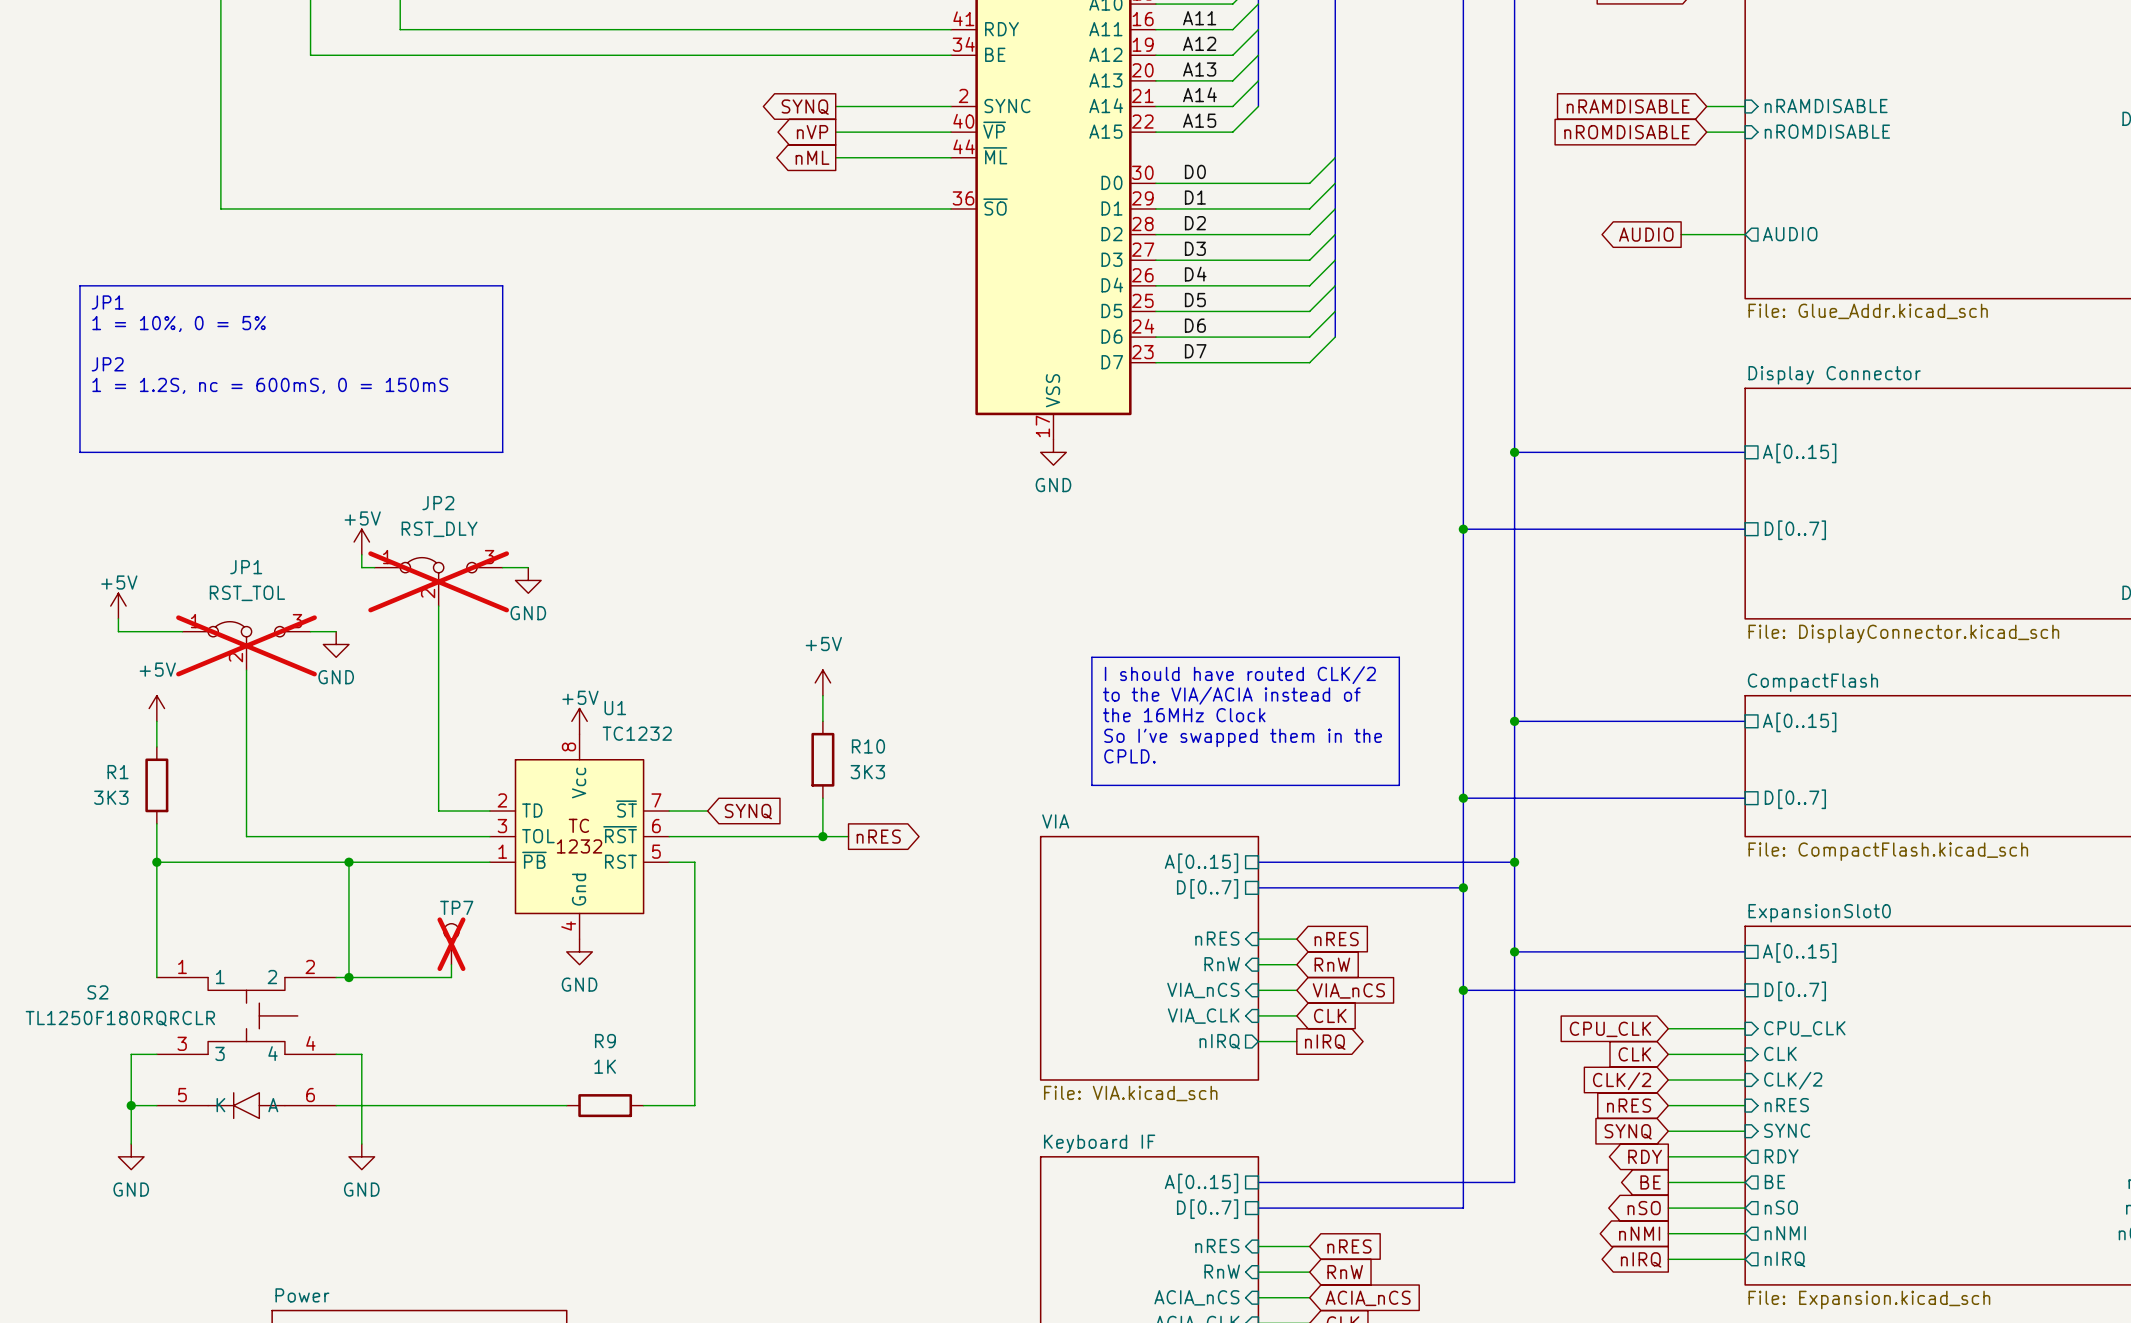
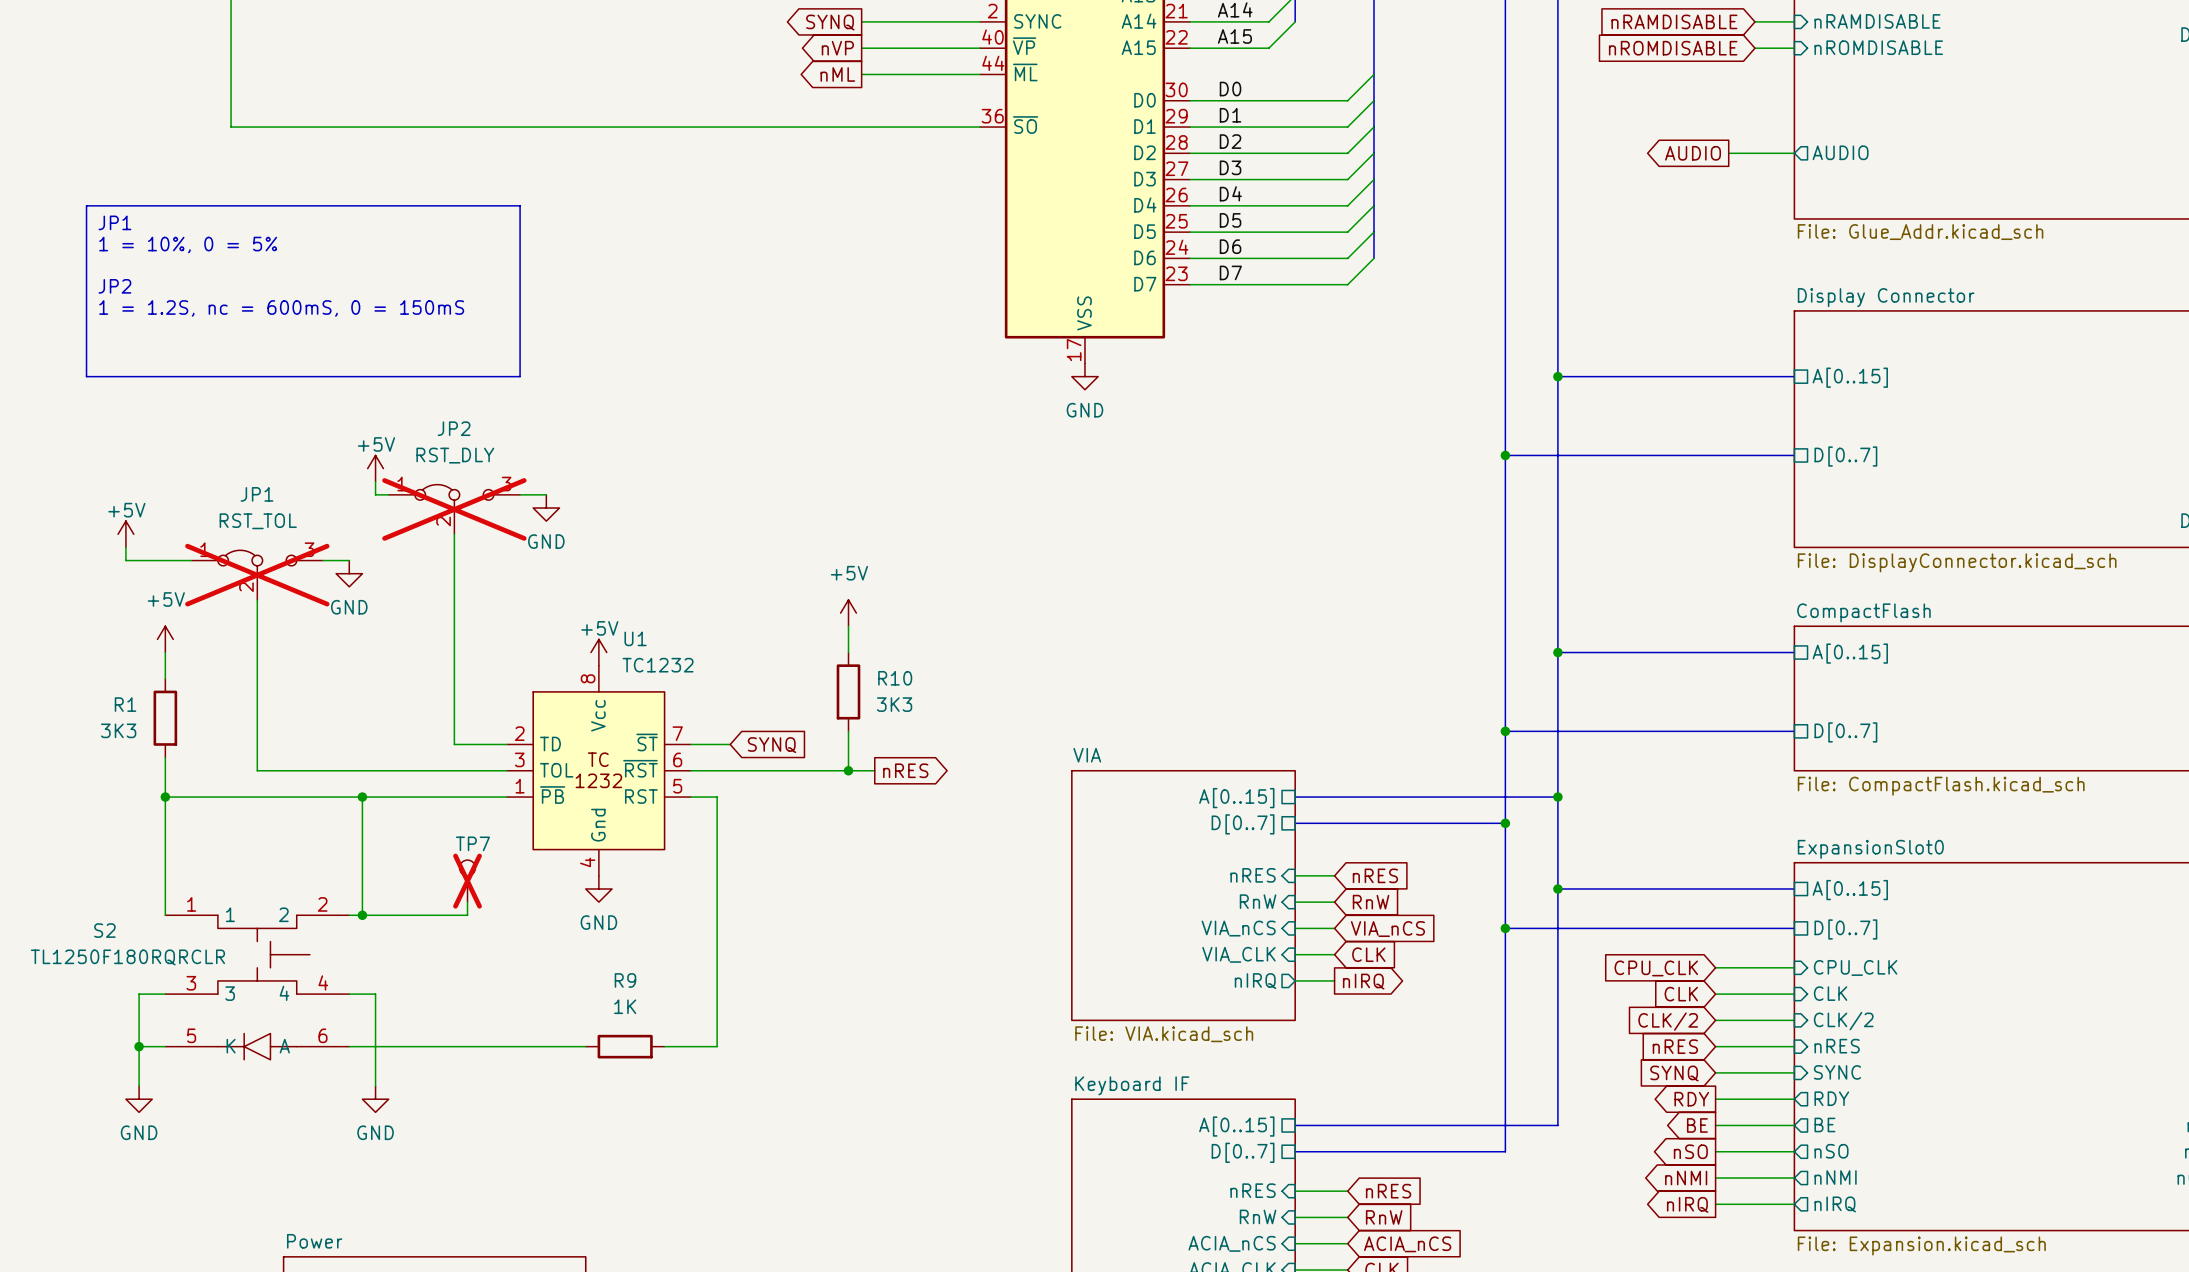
line: (1091, 657) (1399, 657) (1399, 785) (1091, 785) (1091, 657) -> none
text: I should have routed CLK/2 (1240, 675) -> none
text: to the VIA/ACIA instead of (1231, 695) -> none
text: the 16MHz Clock (1184, 715) -> none
text: So I've swapped them in the (1243, 737) -> none
text: CPLD. (1129, 756) -> none

